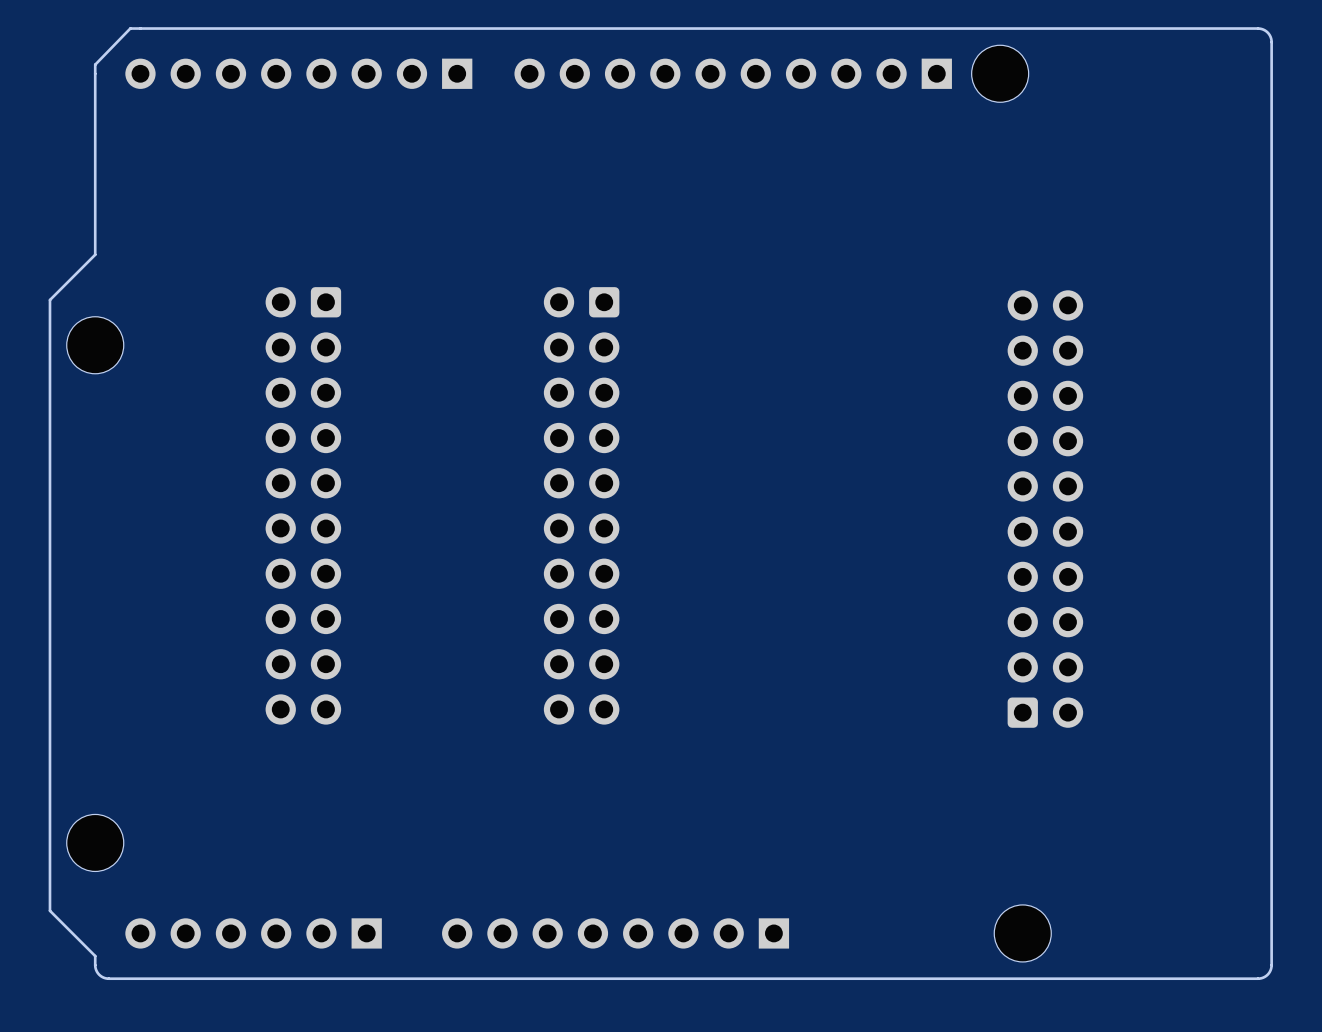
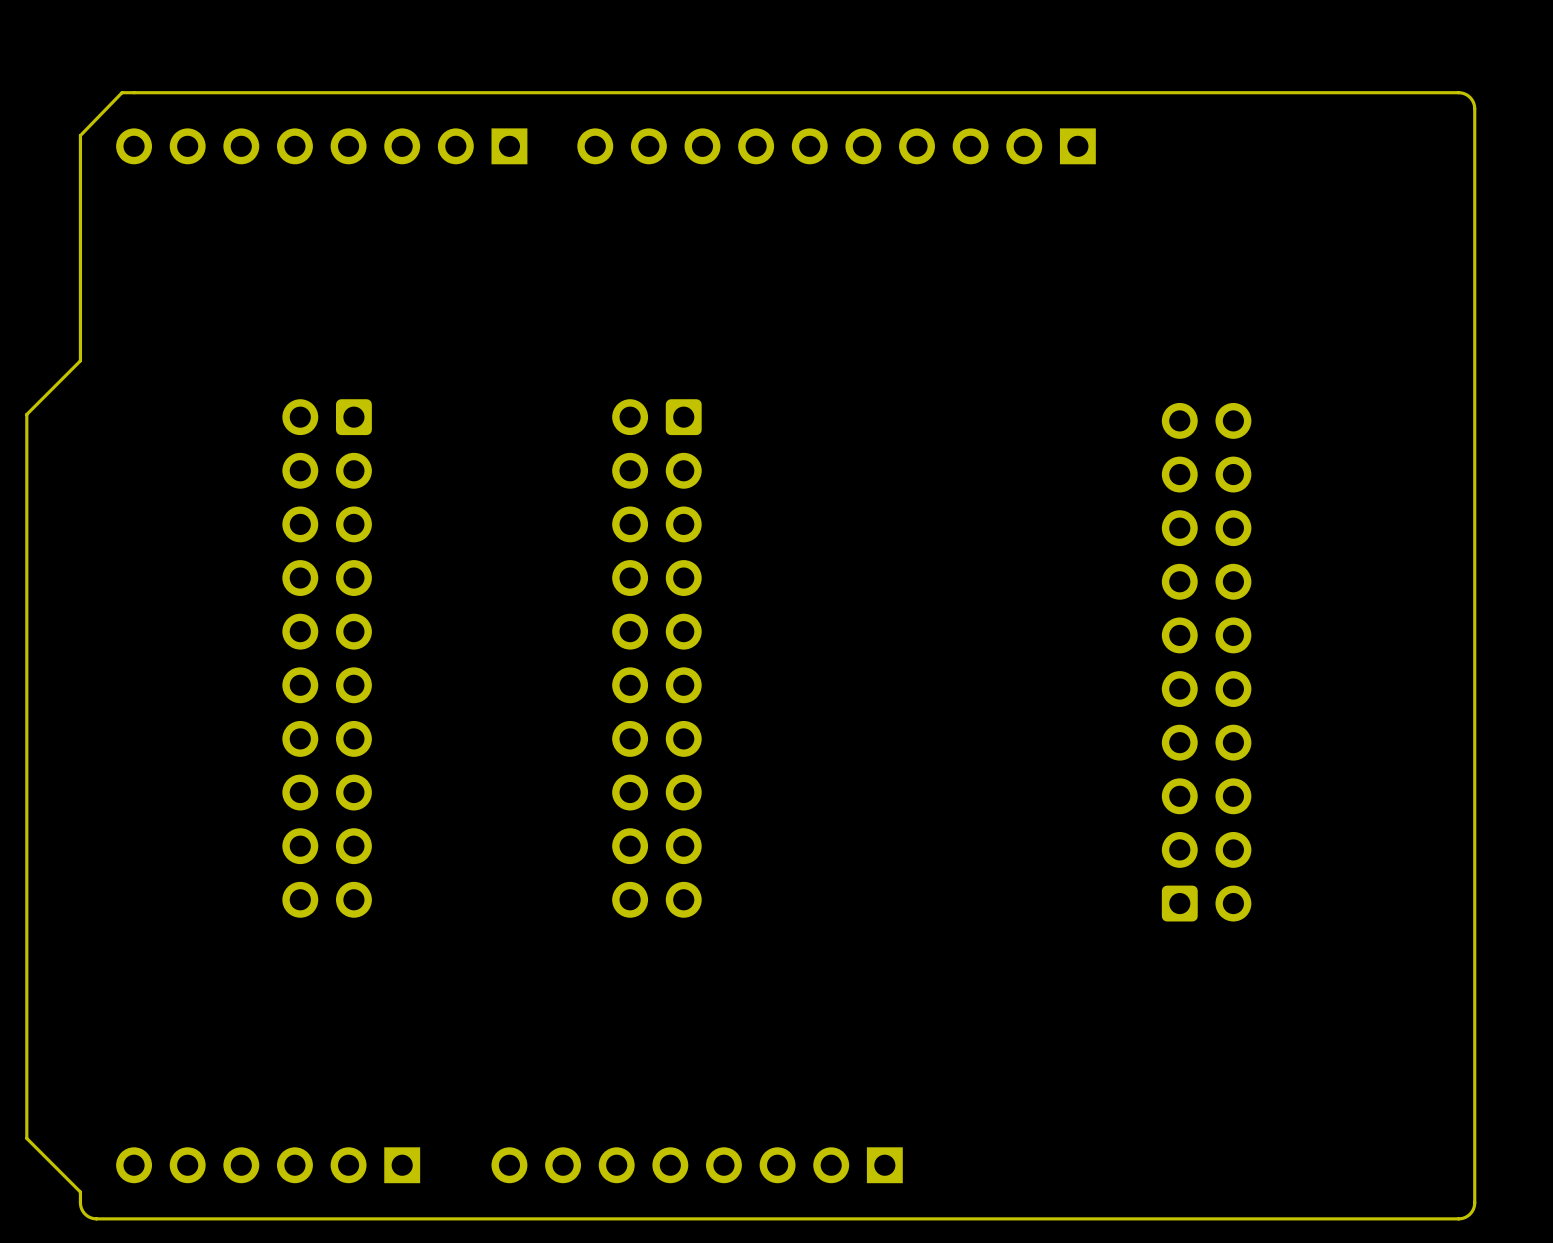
part: (1000, 73) -> none
part: (95, 345) -> none
part: (95, 842) -> none
part: (1022, 933) -> none

